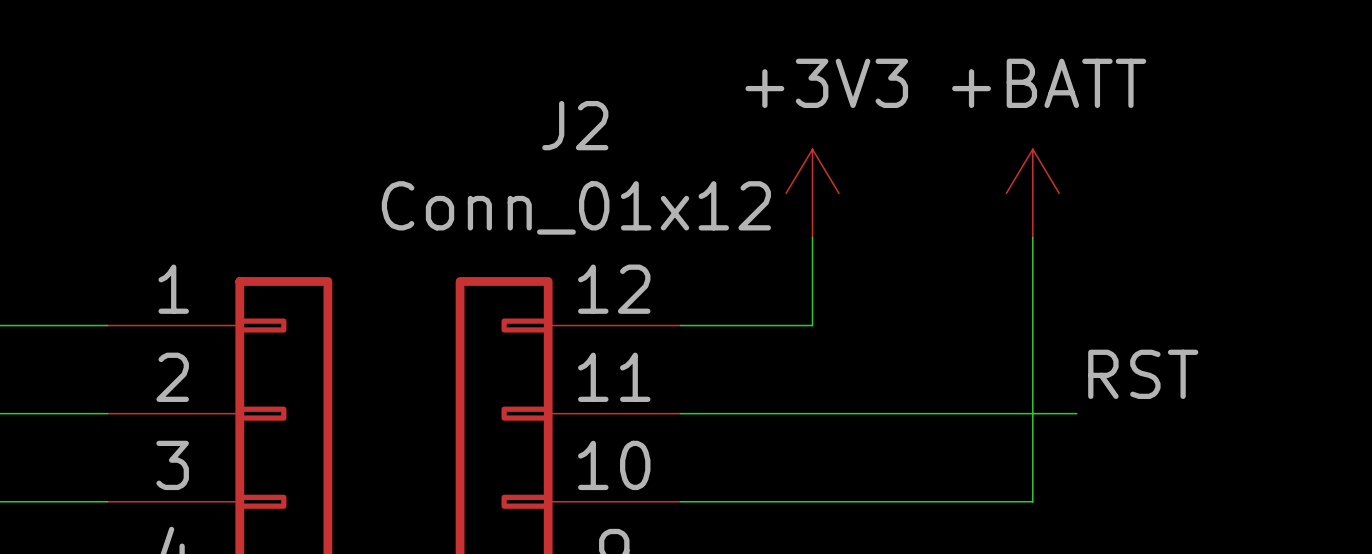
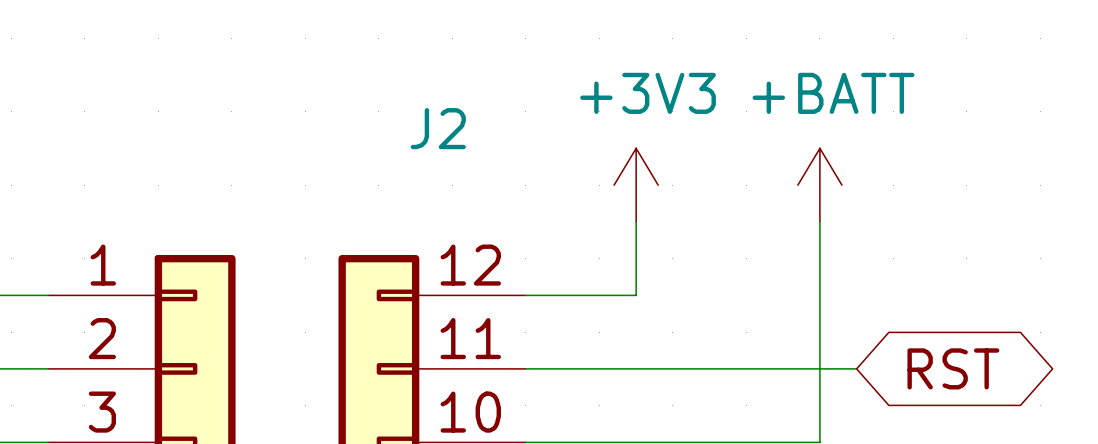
J2 value: Conn_01x12 (576, 207) -> none
label: RST (1143, 374) -> none
global label: none -> RST (953, 368)

